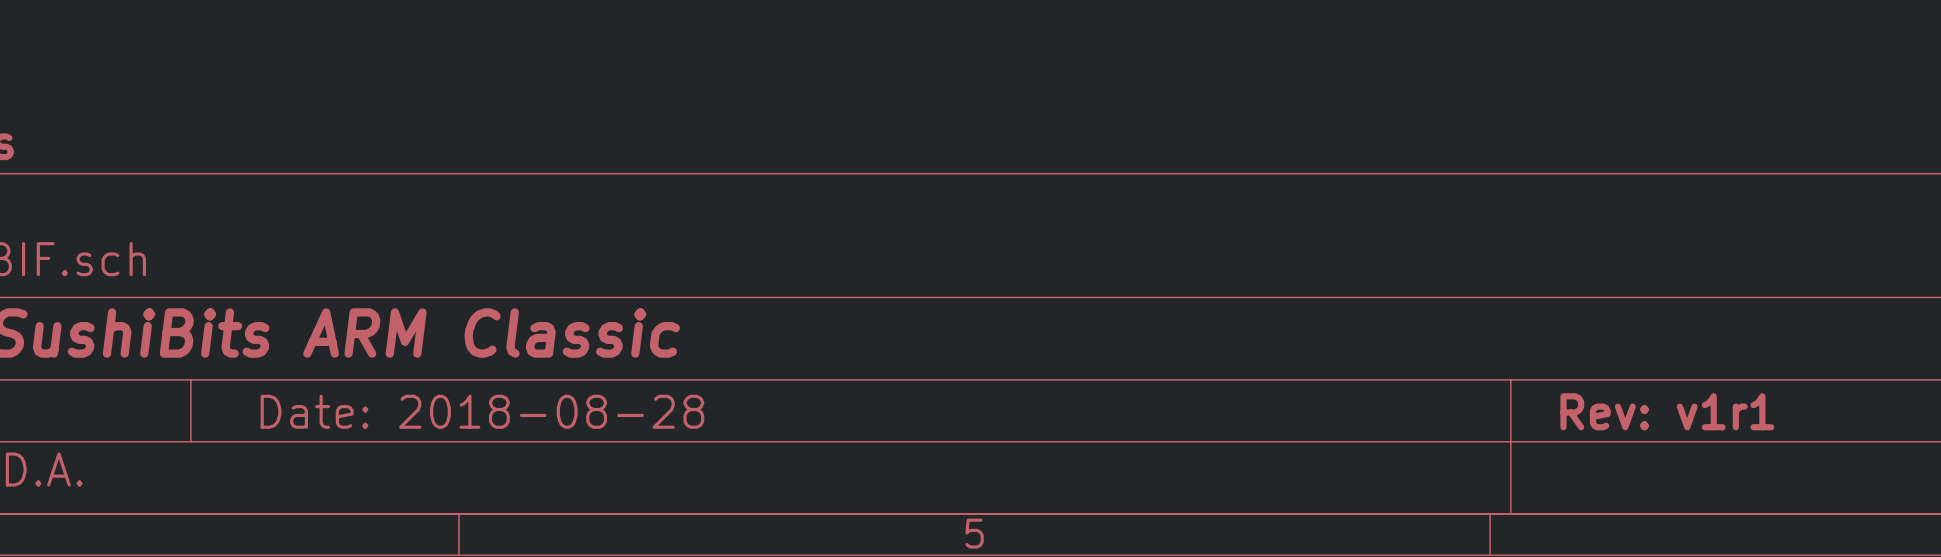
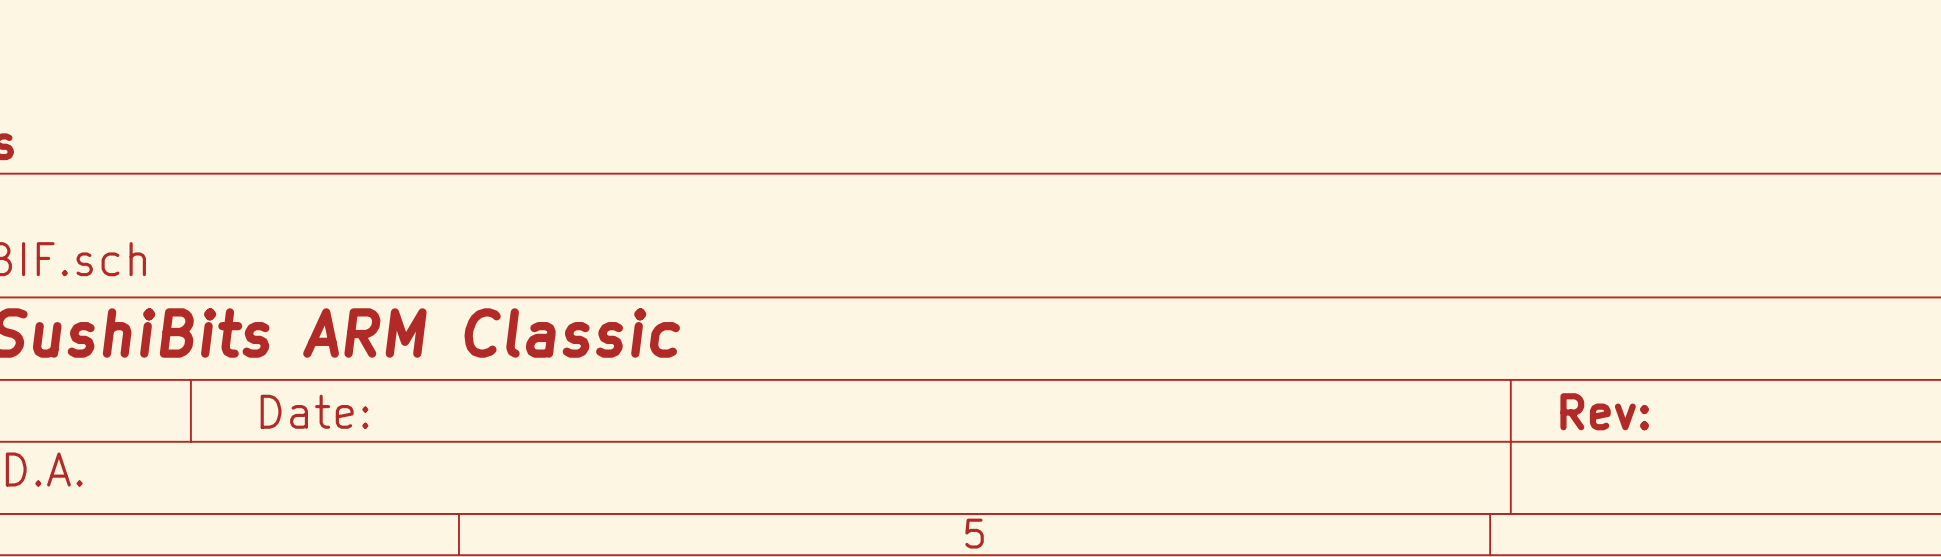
title block: Date: 2018-08-28 (482, 411) -> Date: (314, 411)
title block: Rev: v1r1 (1667, 411) -> Rev: (1604, 411)

